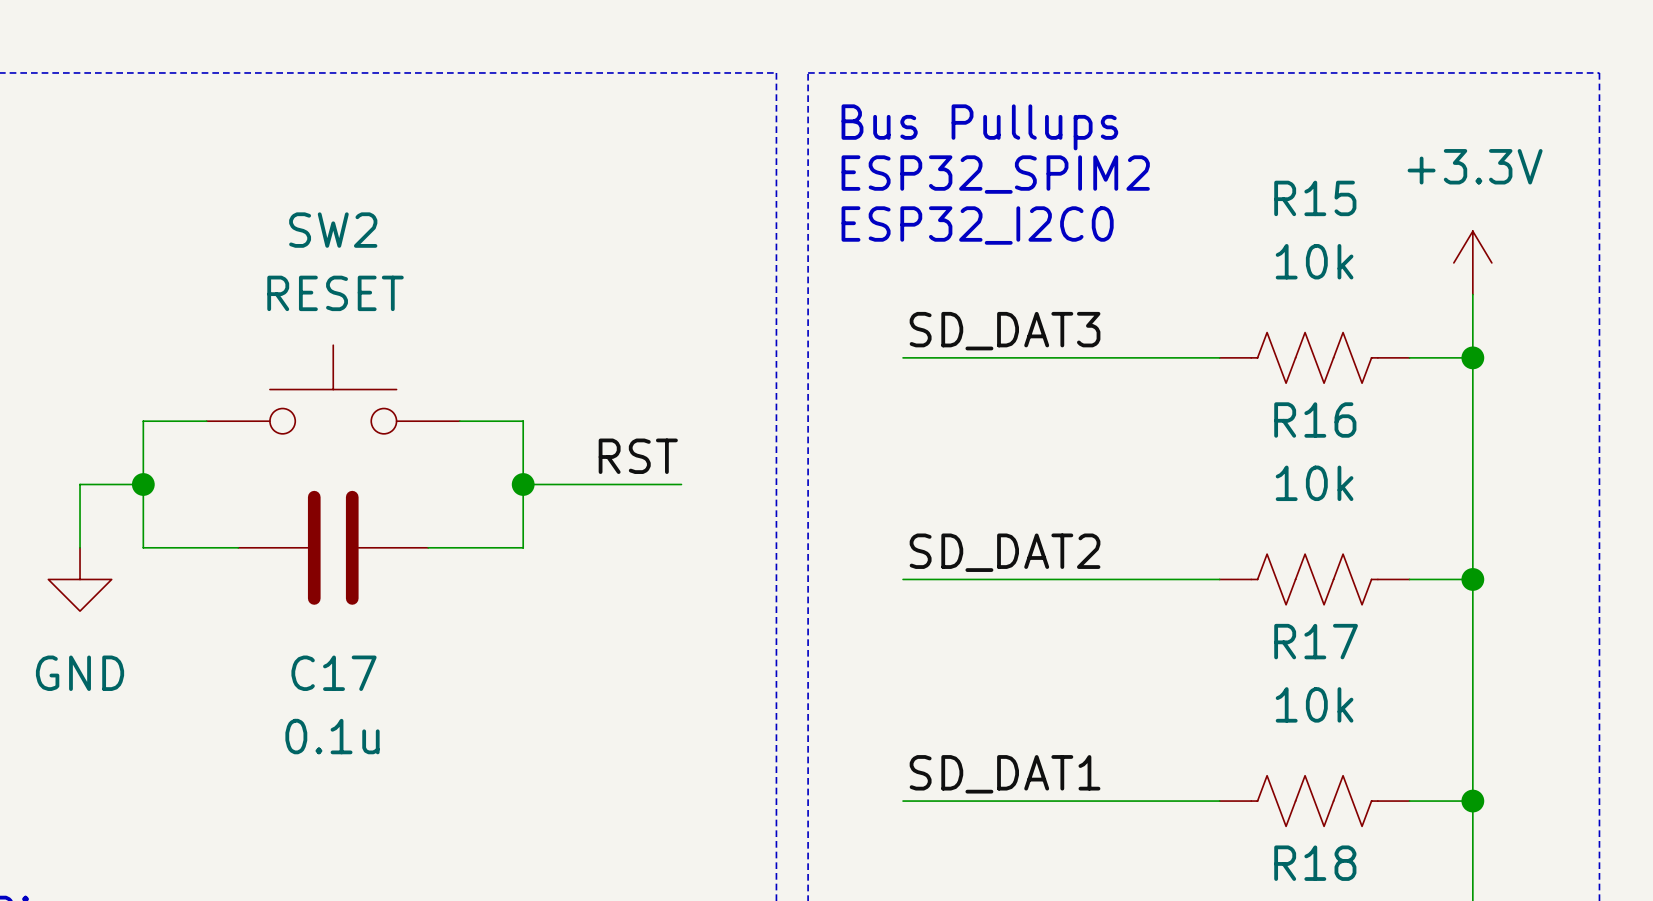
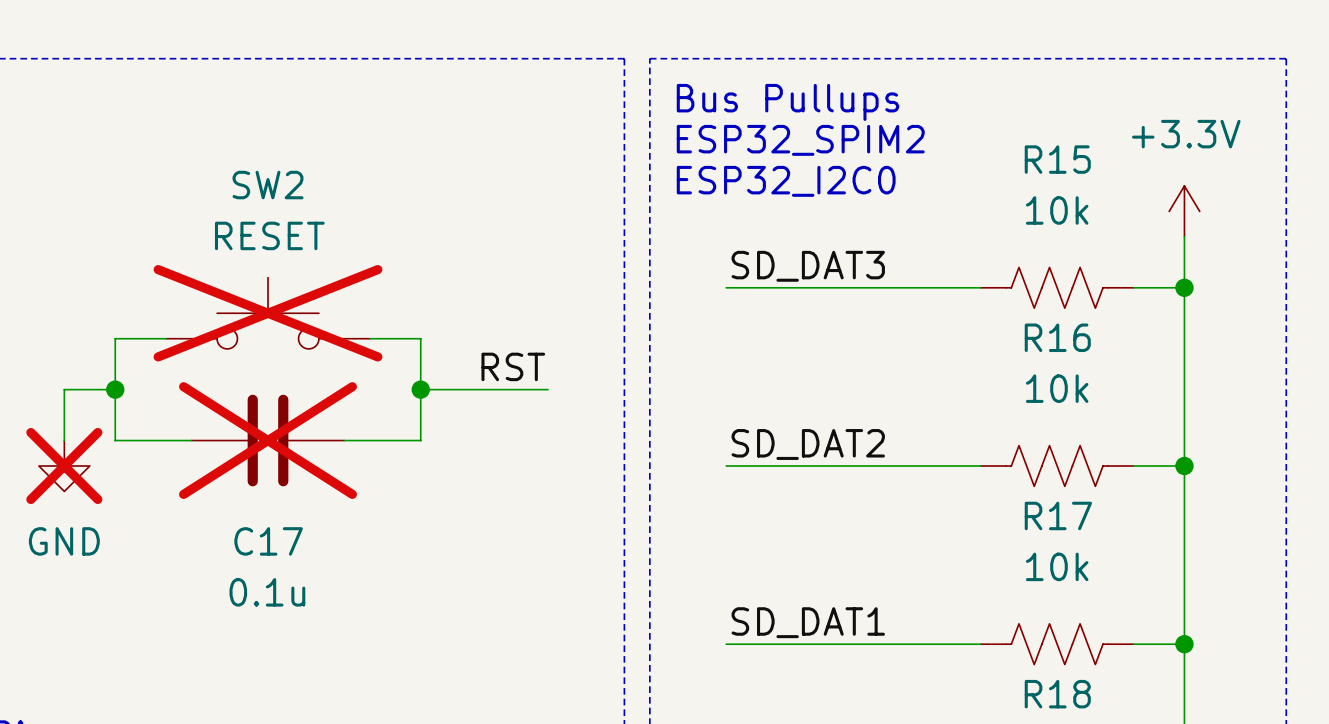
SW2 do-not-place cross: none -> (268, 313)
C17 do-not-place cross: none -> (268, 440)
power symbol do-not-place cross: none -> (64, 466)

